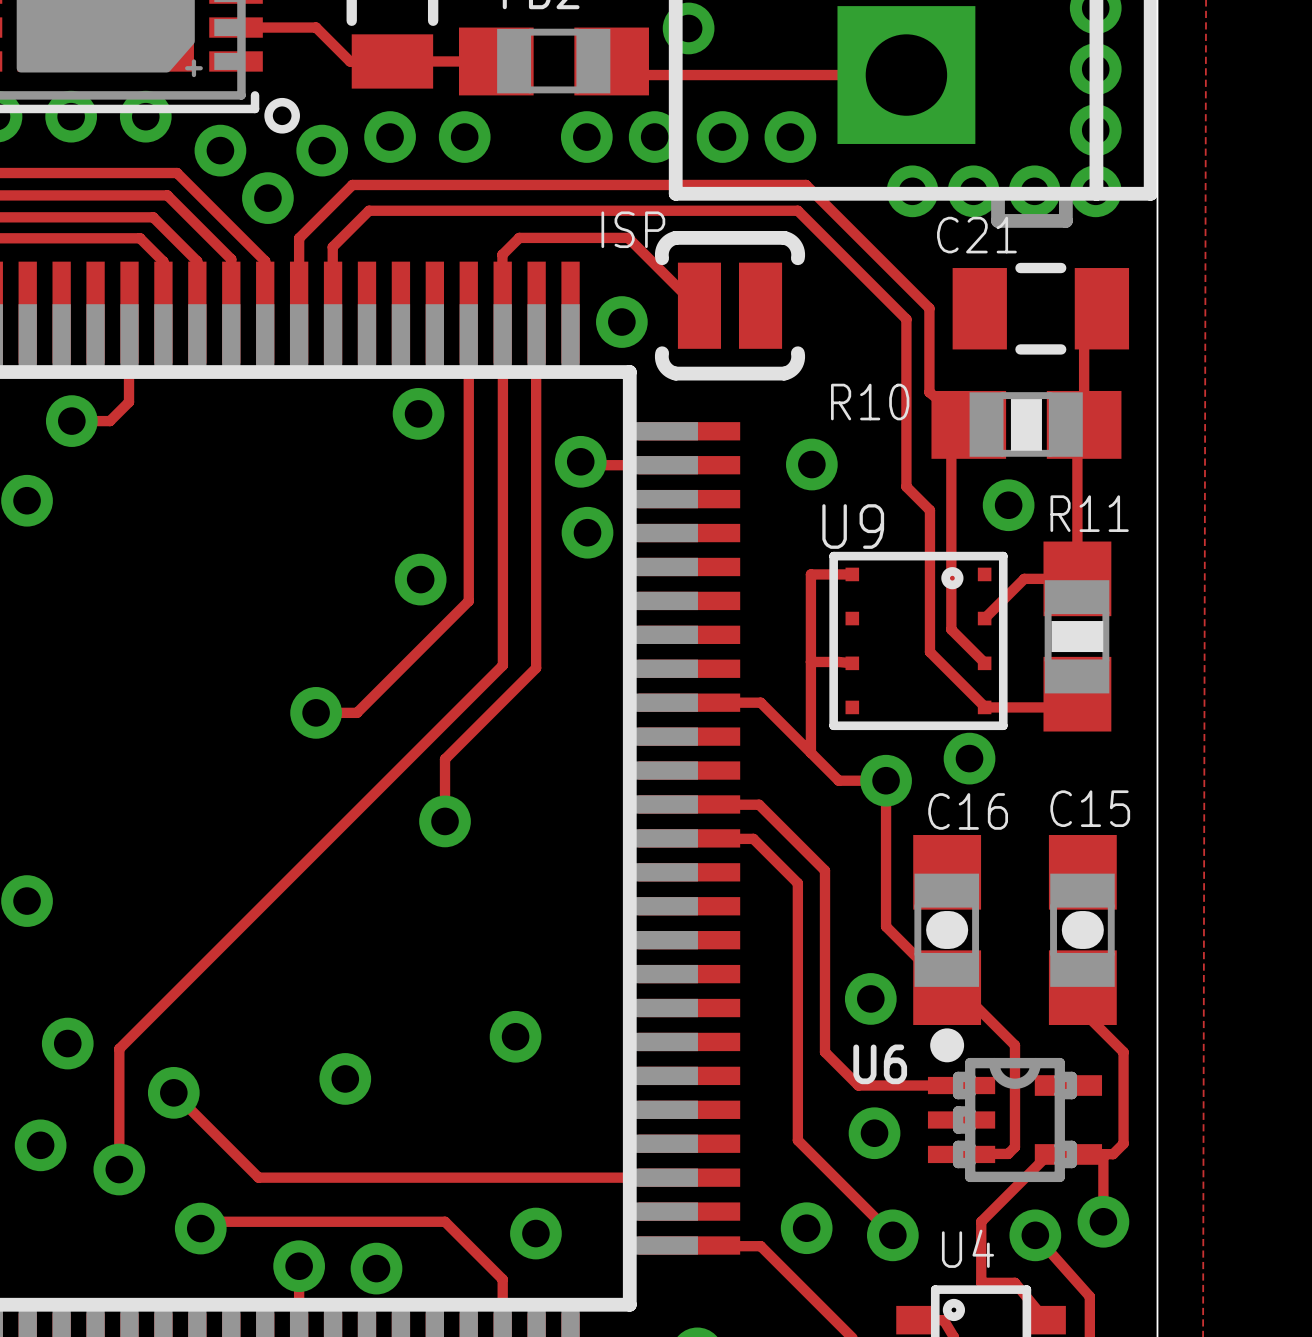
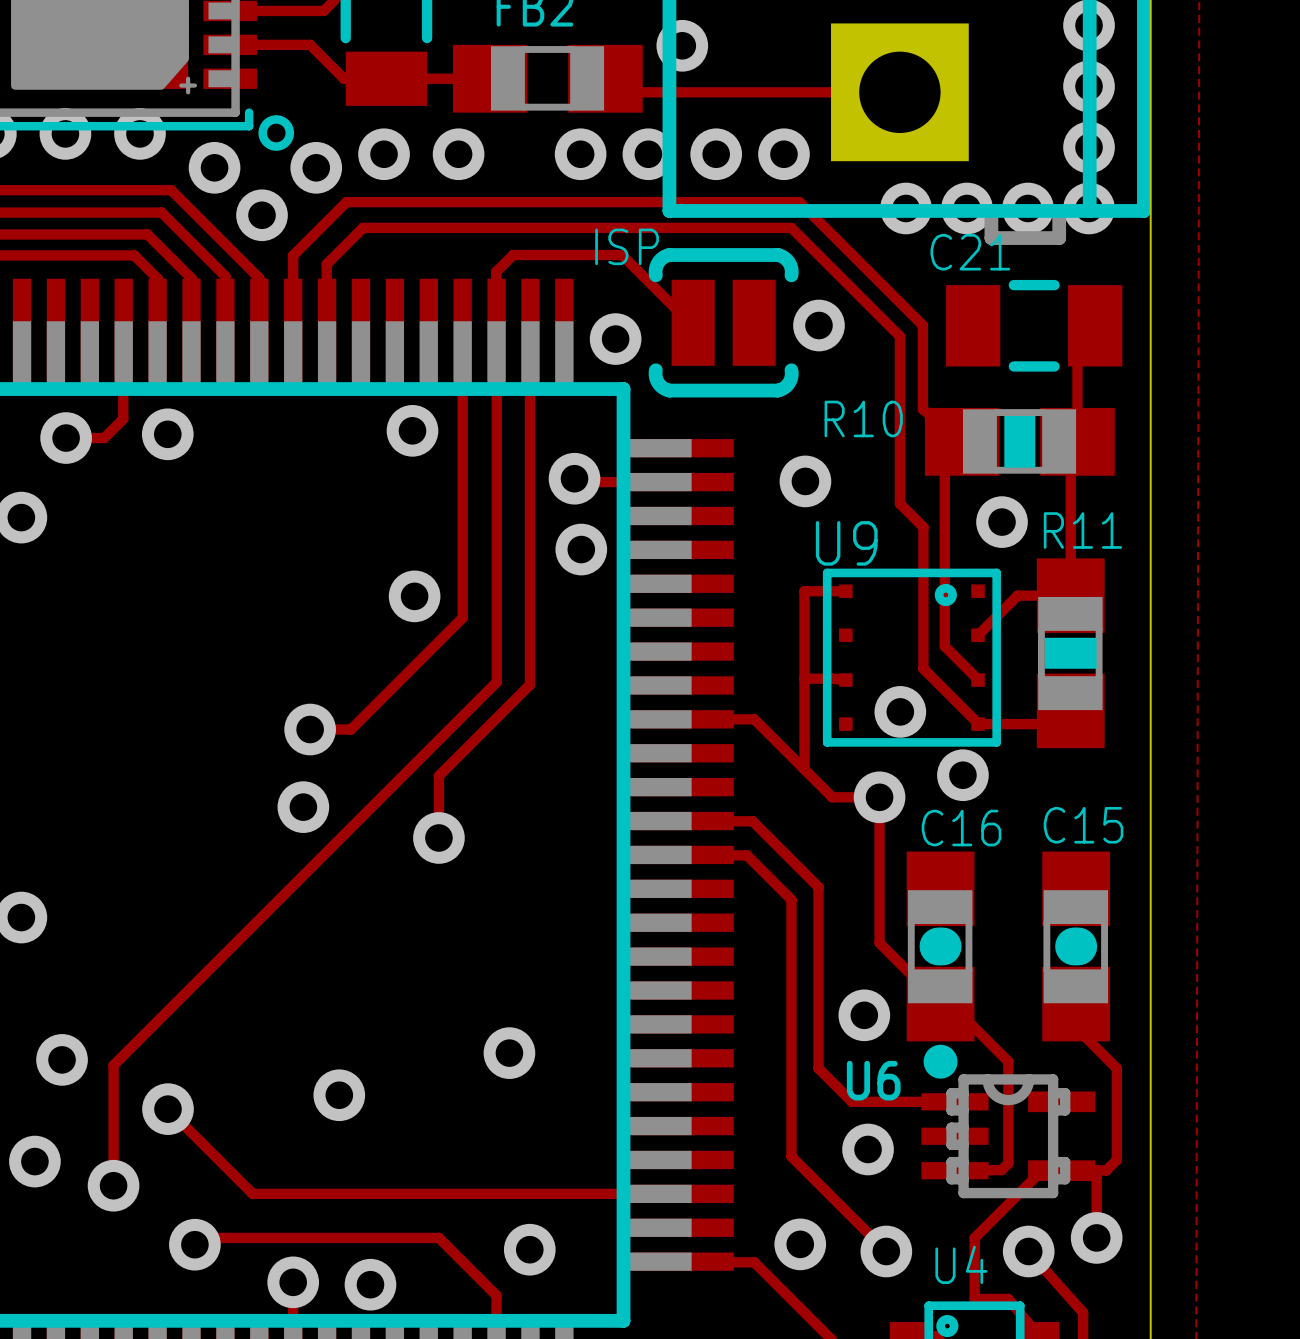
via: none -> (818, 325)
via: none -> (167, 434)
via: none -> (900, 711)
via: none -> (303, 807)

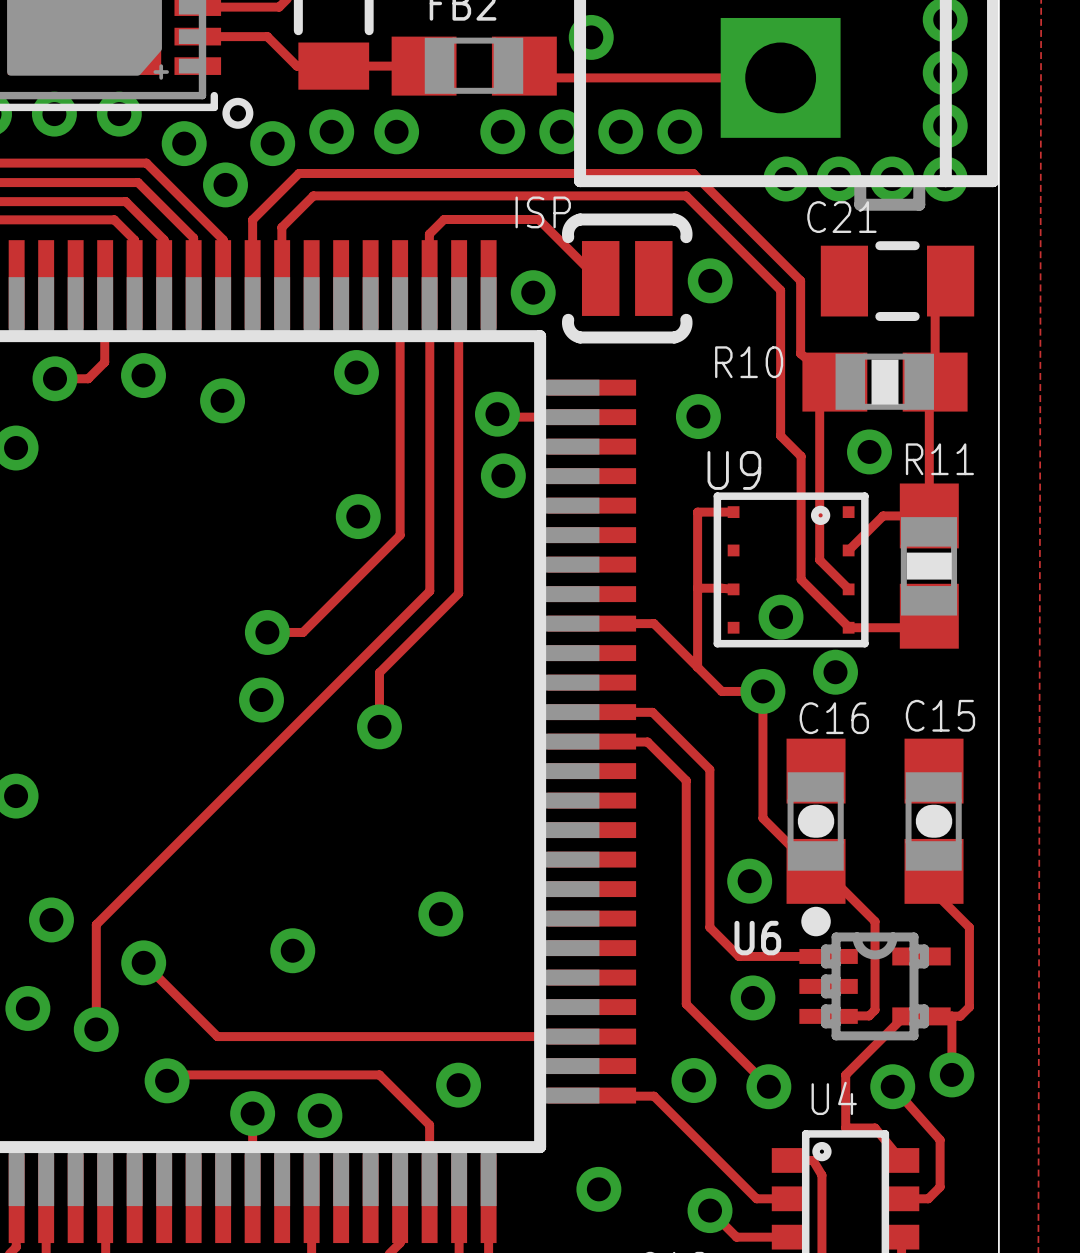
via: none -> (222, 400)

